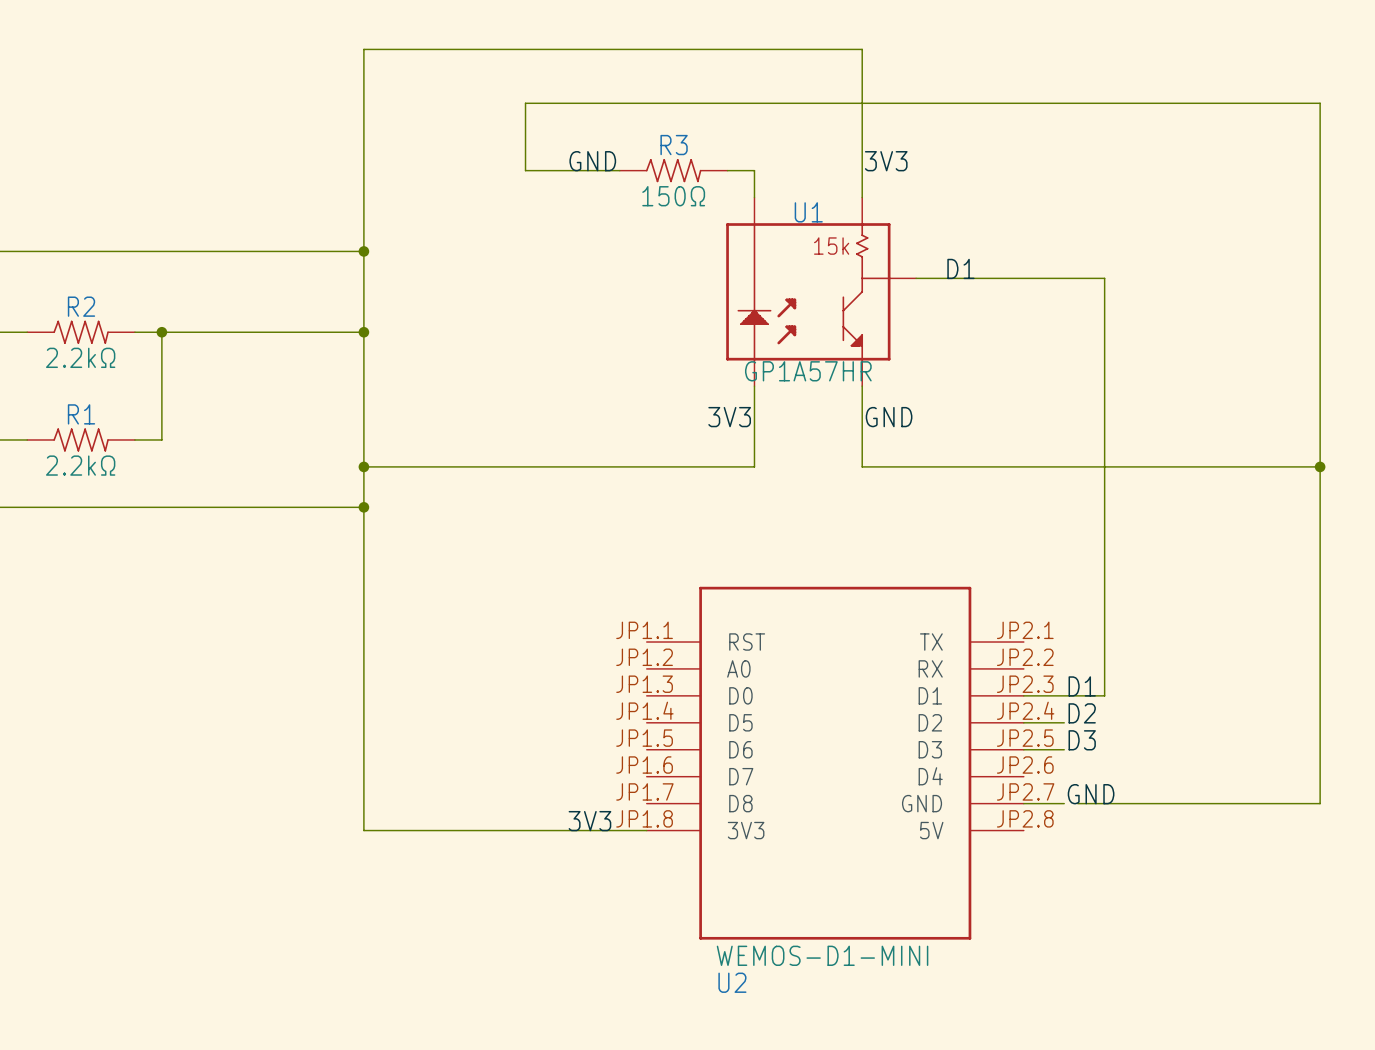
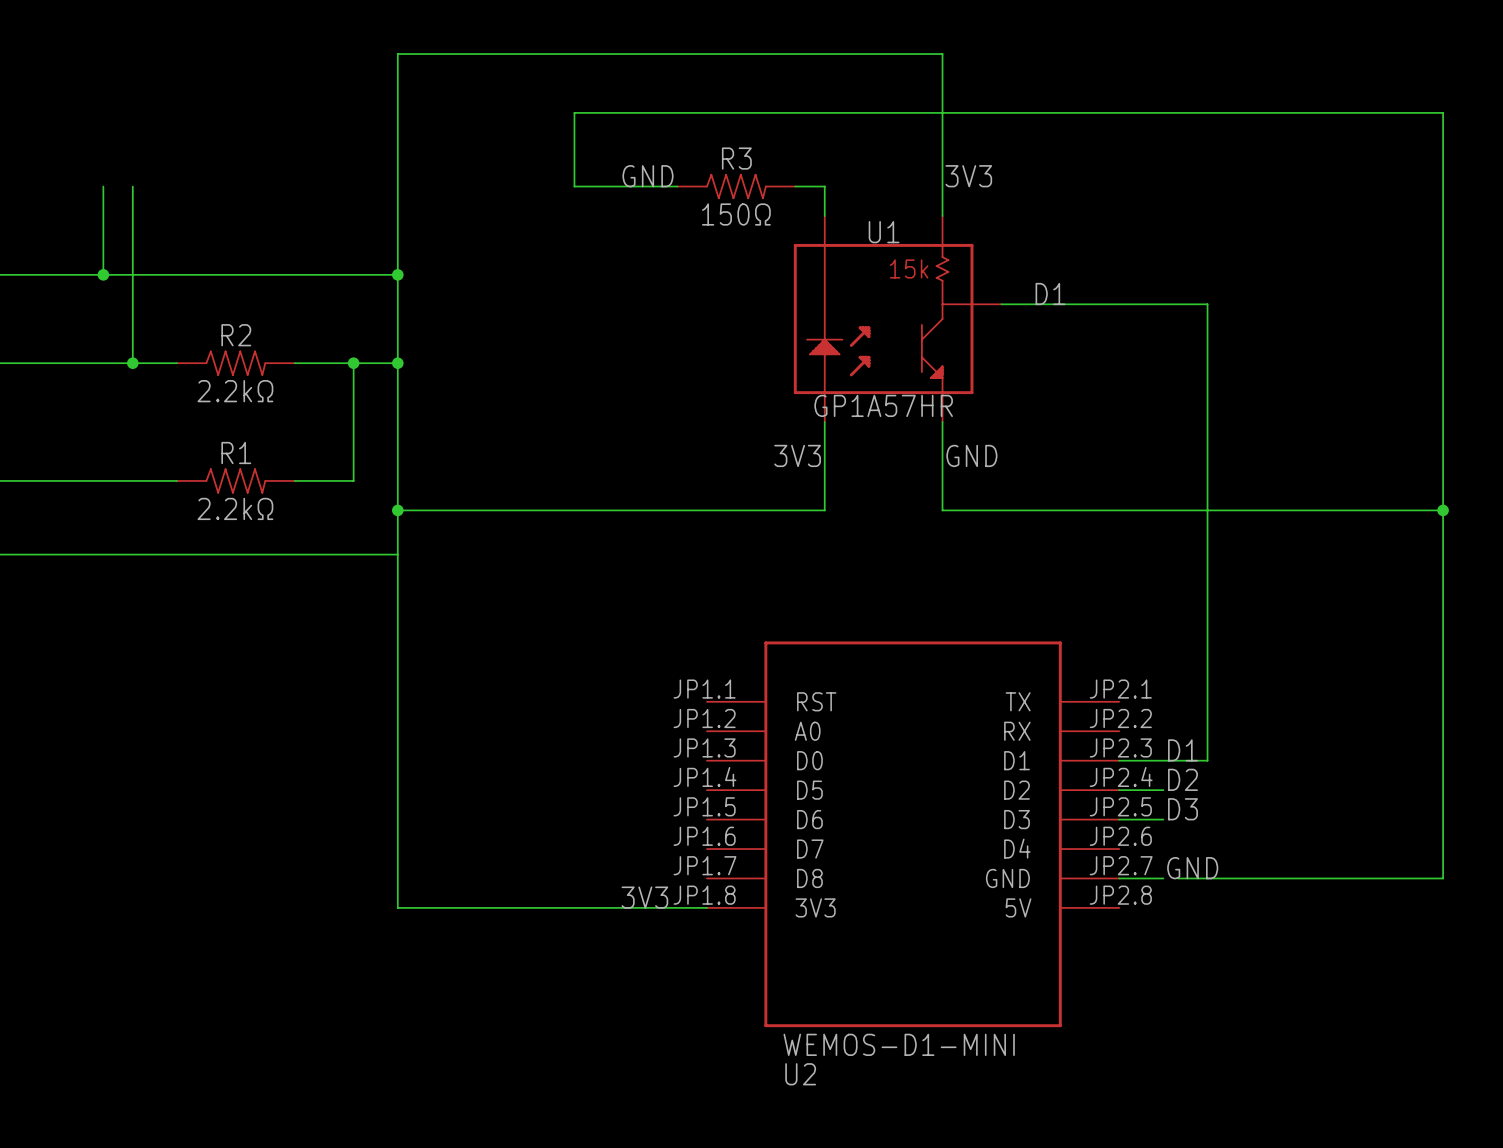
wire: none -> (103, 186) (103, 274)
wire: none -> (132, 186) (132, 363)
junction: none -> (103, 274)
R2 position: (81, 332) -> (235, 363)
junction position: (161, 332) -> (132, 363)
wire: (269, 332) (161, 332) (161, 439) -> none
wire: none -> (353, 363) (353, 480) (294, 480)
junction: none -> (353, 363)
R1 position: (81, 439) -> (235, 480)
junction: (363, 507) -> none

